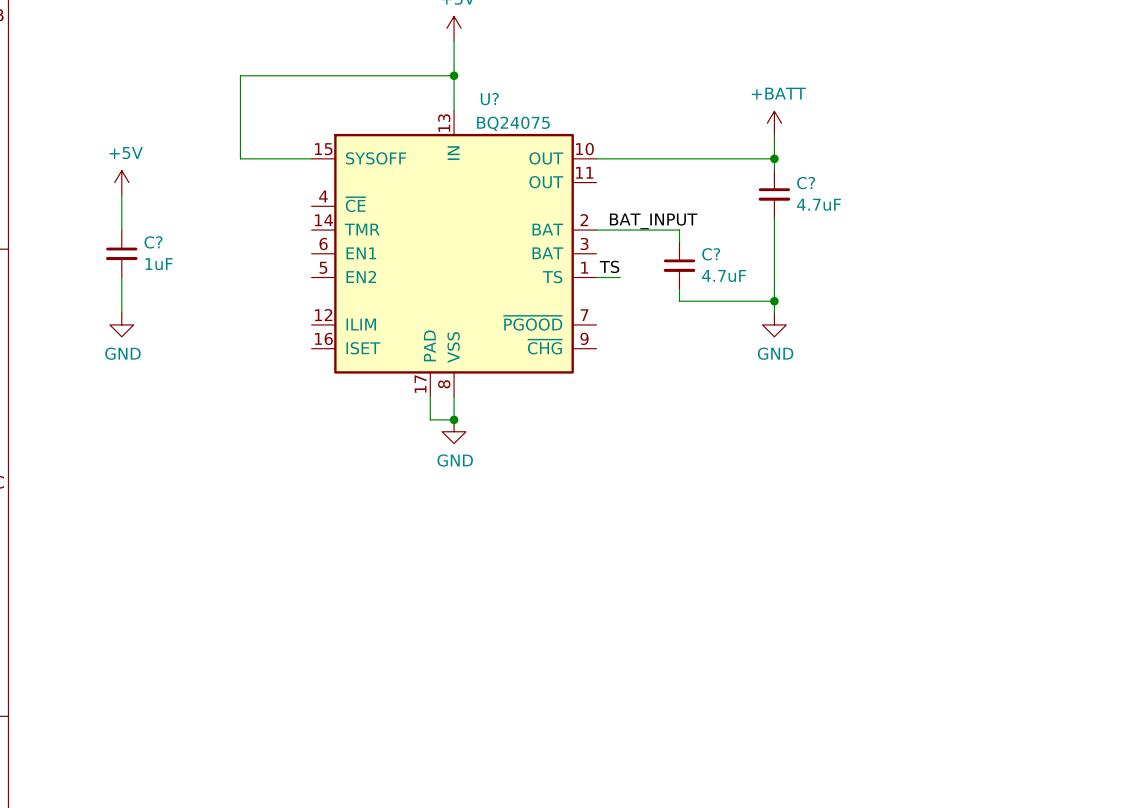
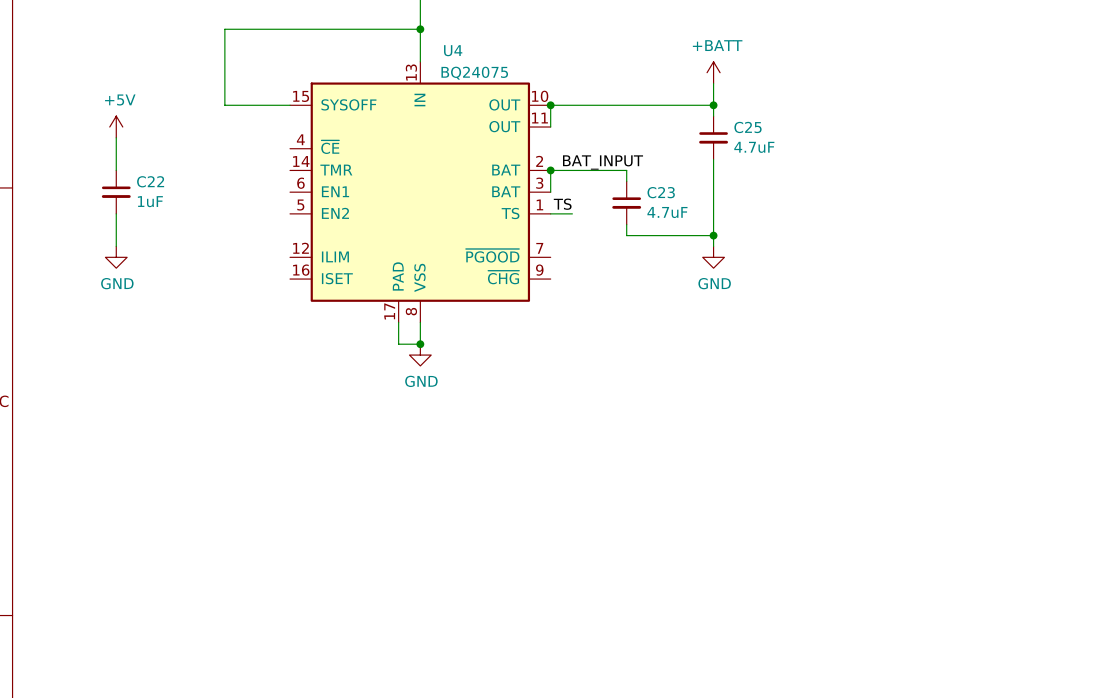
U? name: U? (489, 99) -> U4 (453, 50)
wire: none -> (550, 105) (550, 127)
junction: none -> (550, 105)
C? name: C? (806, 183) -> C25 (748, 127)
wire: none -> (550, 170) (550, 192)
junction: none -> (550, 170)
C? name: C? (153, 242) -> C22 (150, 181)
C? name: C? (711, 254) -> C23 (661, 192)

